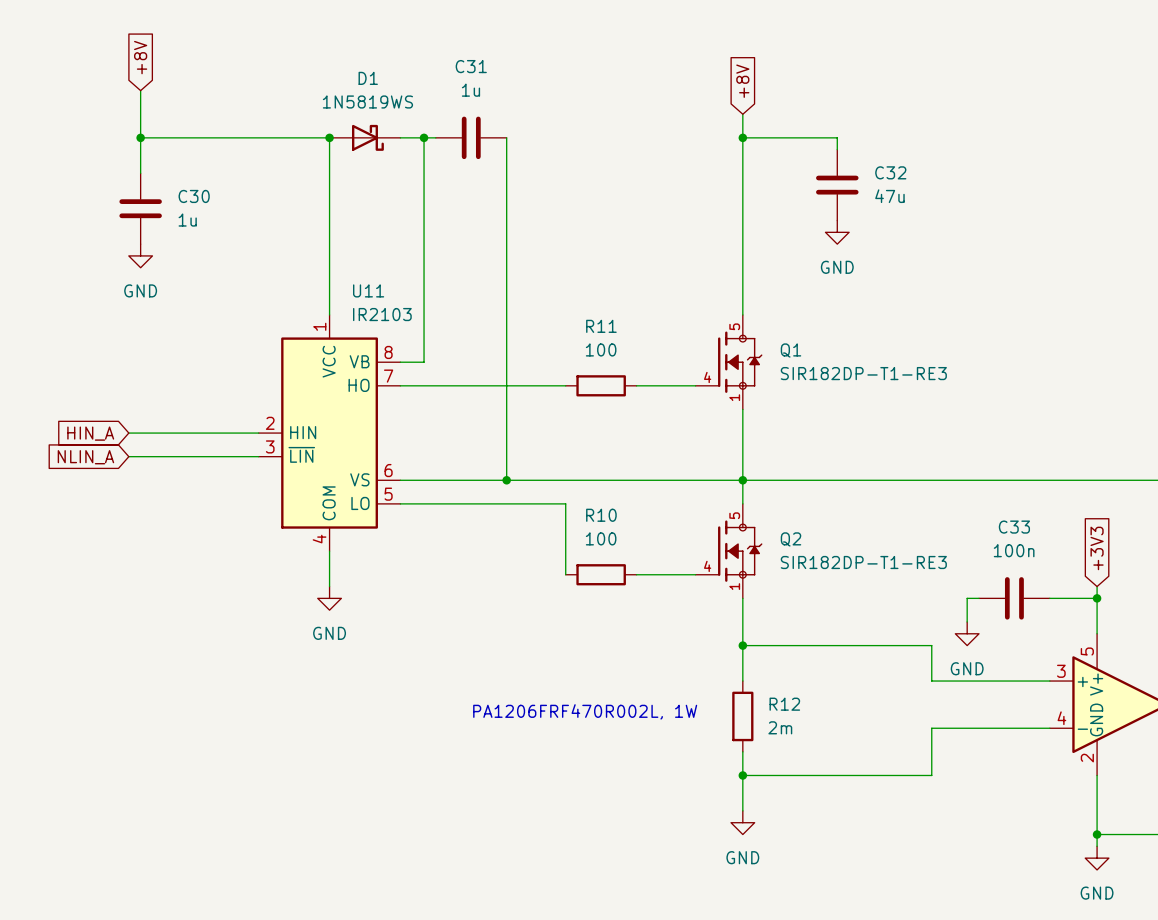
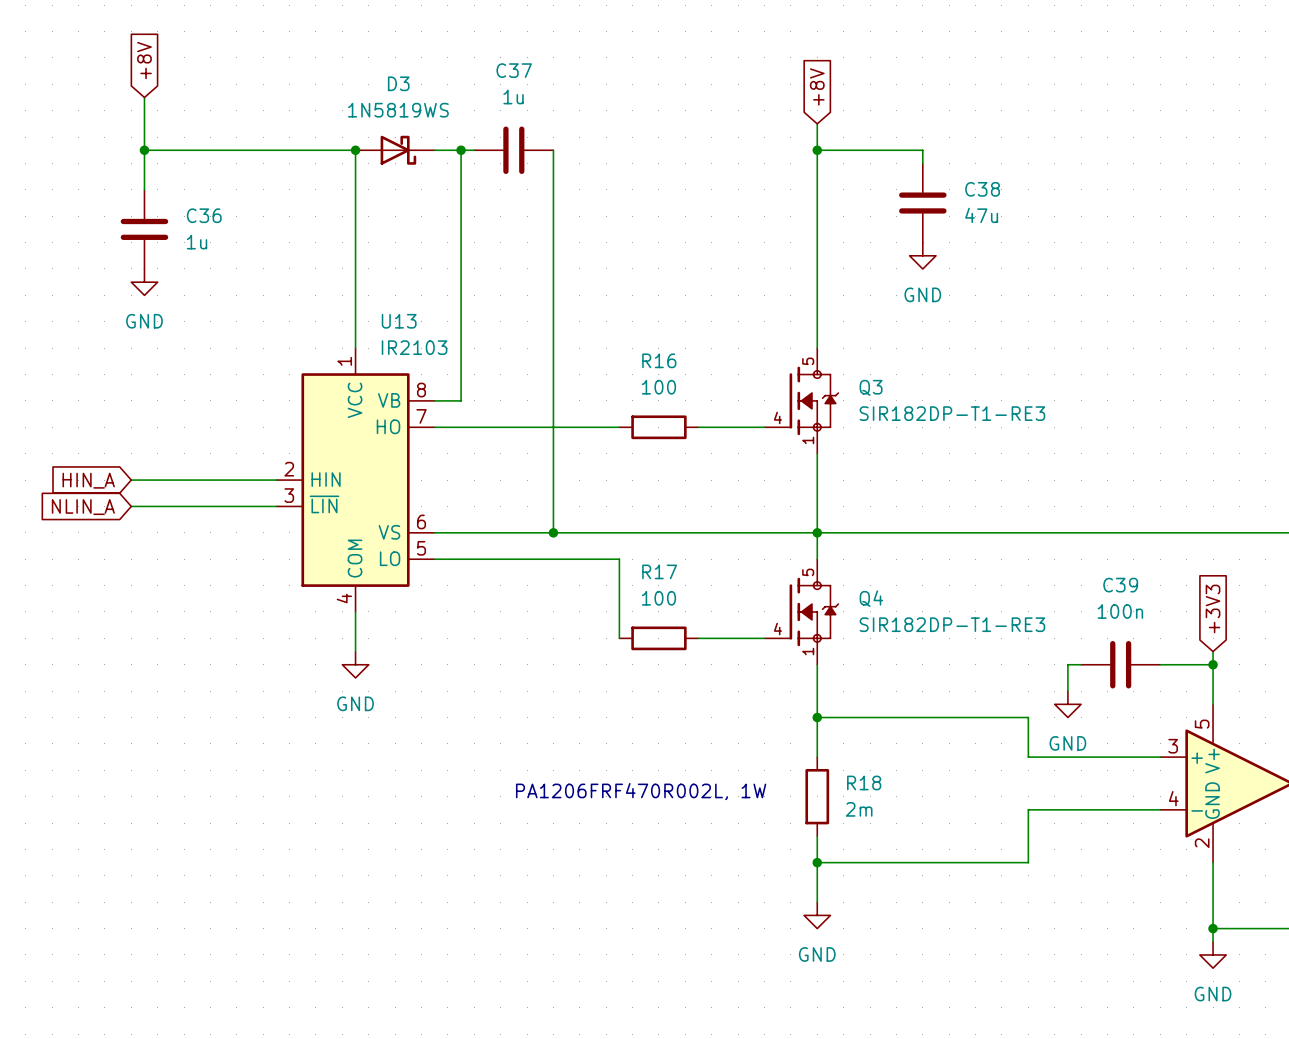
C31 name: C31 (471, 66) -> C37 (514, 70)
D1 name: D1 (368, 78) -> D3 (398, 83)
C32 name: C32 (890, 172) -> C38 (982, 189)
C30 name: C30 (194, 196) -> C36 (204, 215)
U11 name: U11 (368, 290) -> U13 (399, 321)
R11 name: R11 (601, 326) -> R16 (659, 360)
Q1 name: Q1 (790, 350) -> Q3 (871, 387)
R10 name: R10 (601, 515) -> R17 (659, 571)
C33 name: C33 (1014, 527) -> C39 (1120, 585)
Q2 name: Q2 (790, 539) -> Q4 (871, 598)
R12 name: R12 (784, 704) -> R18 (864, 782)

